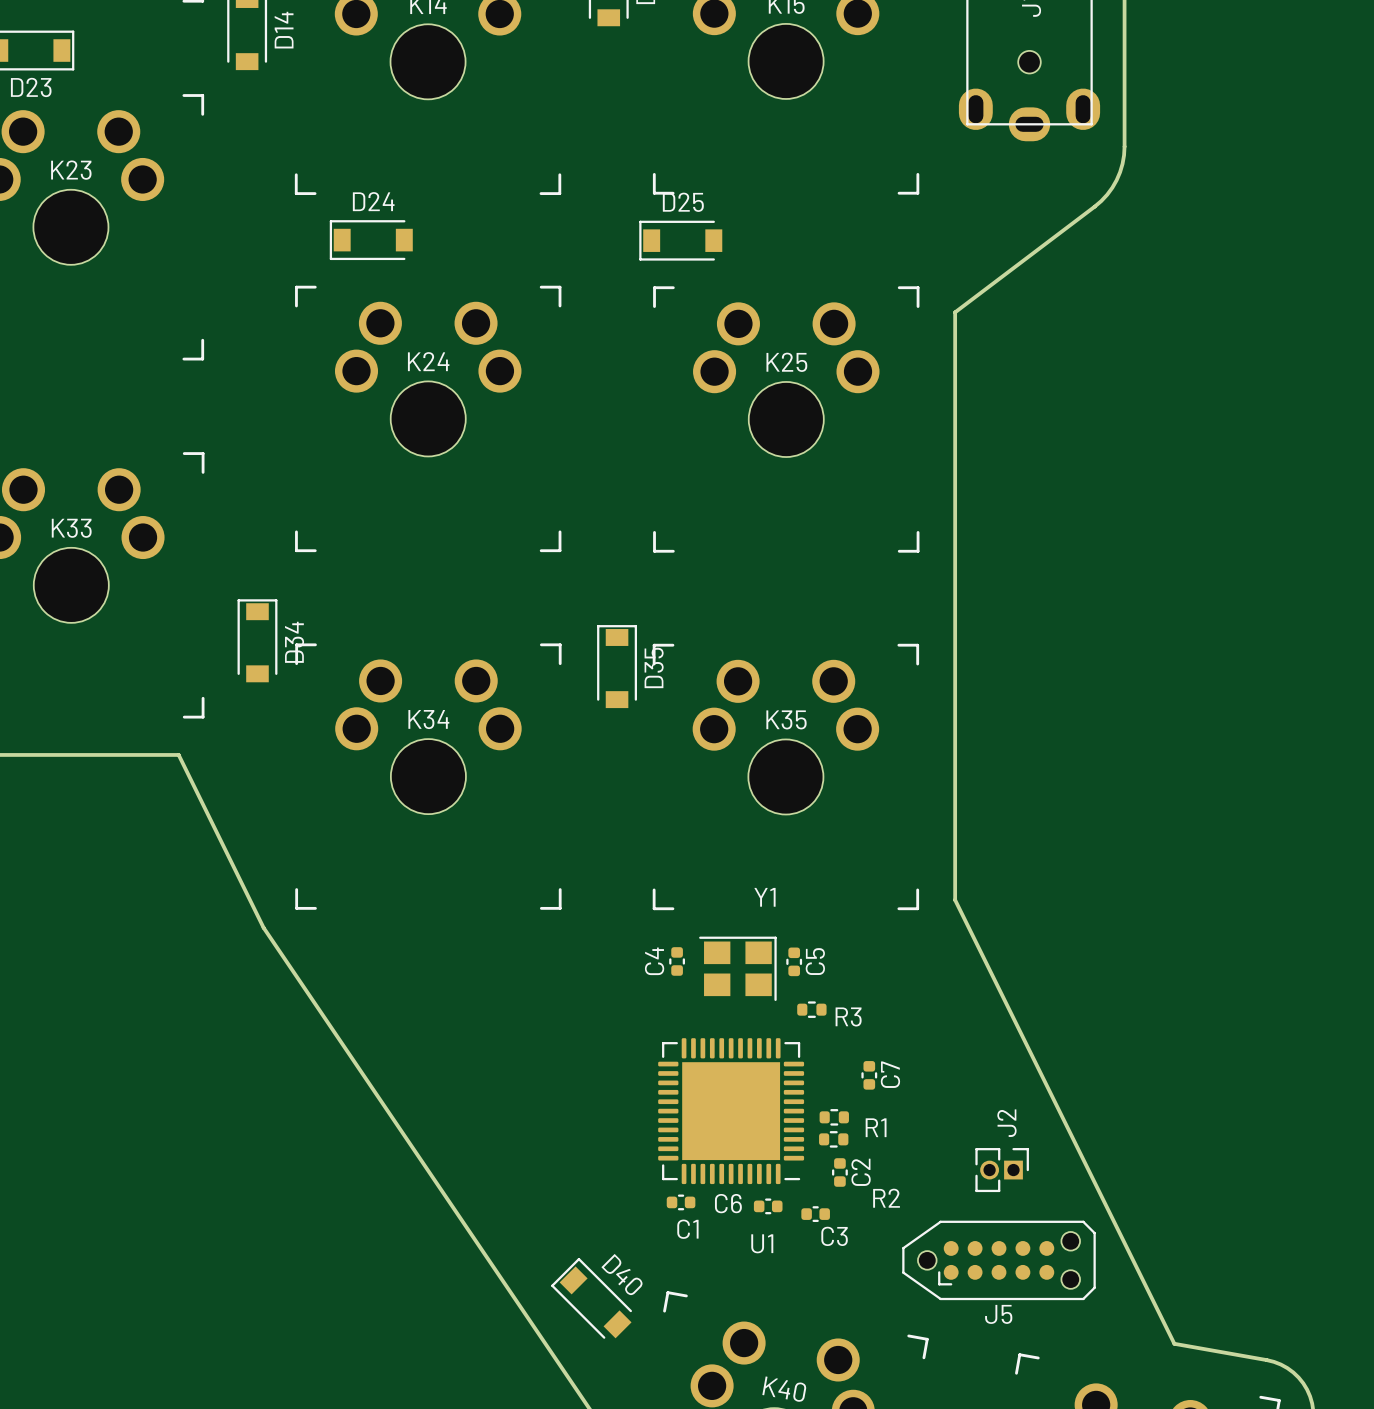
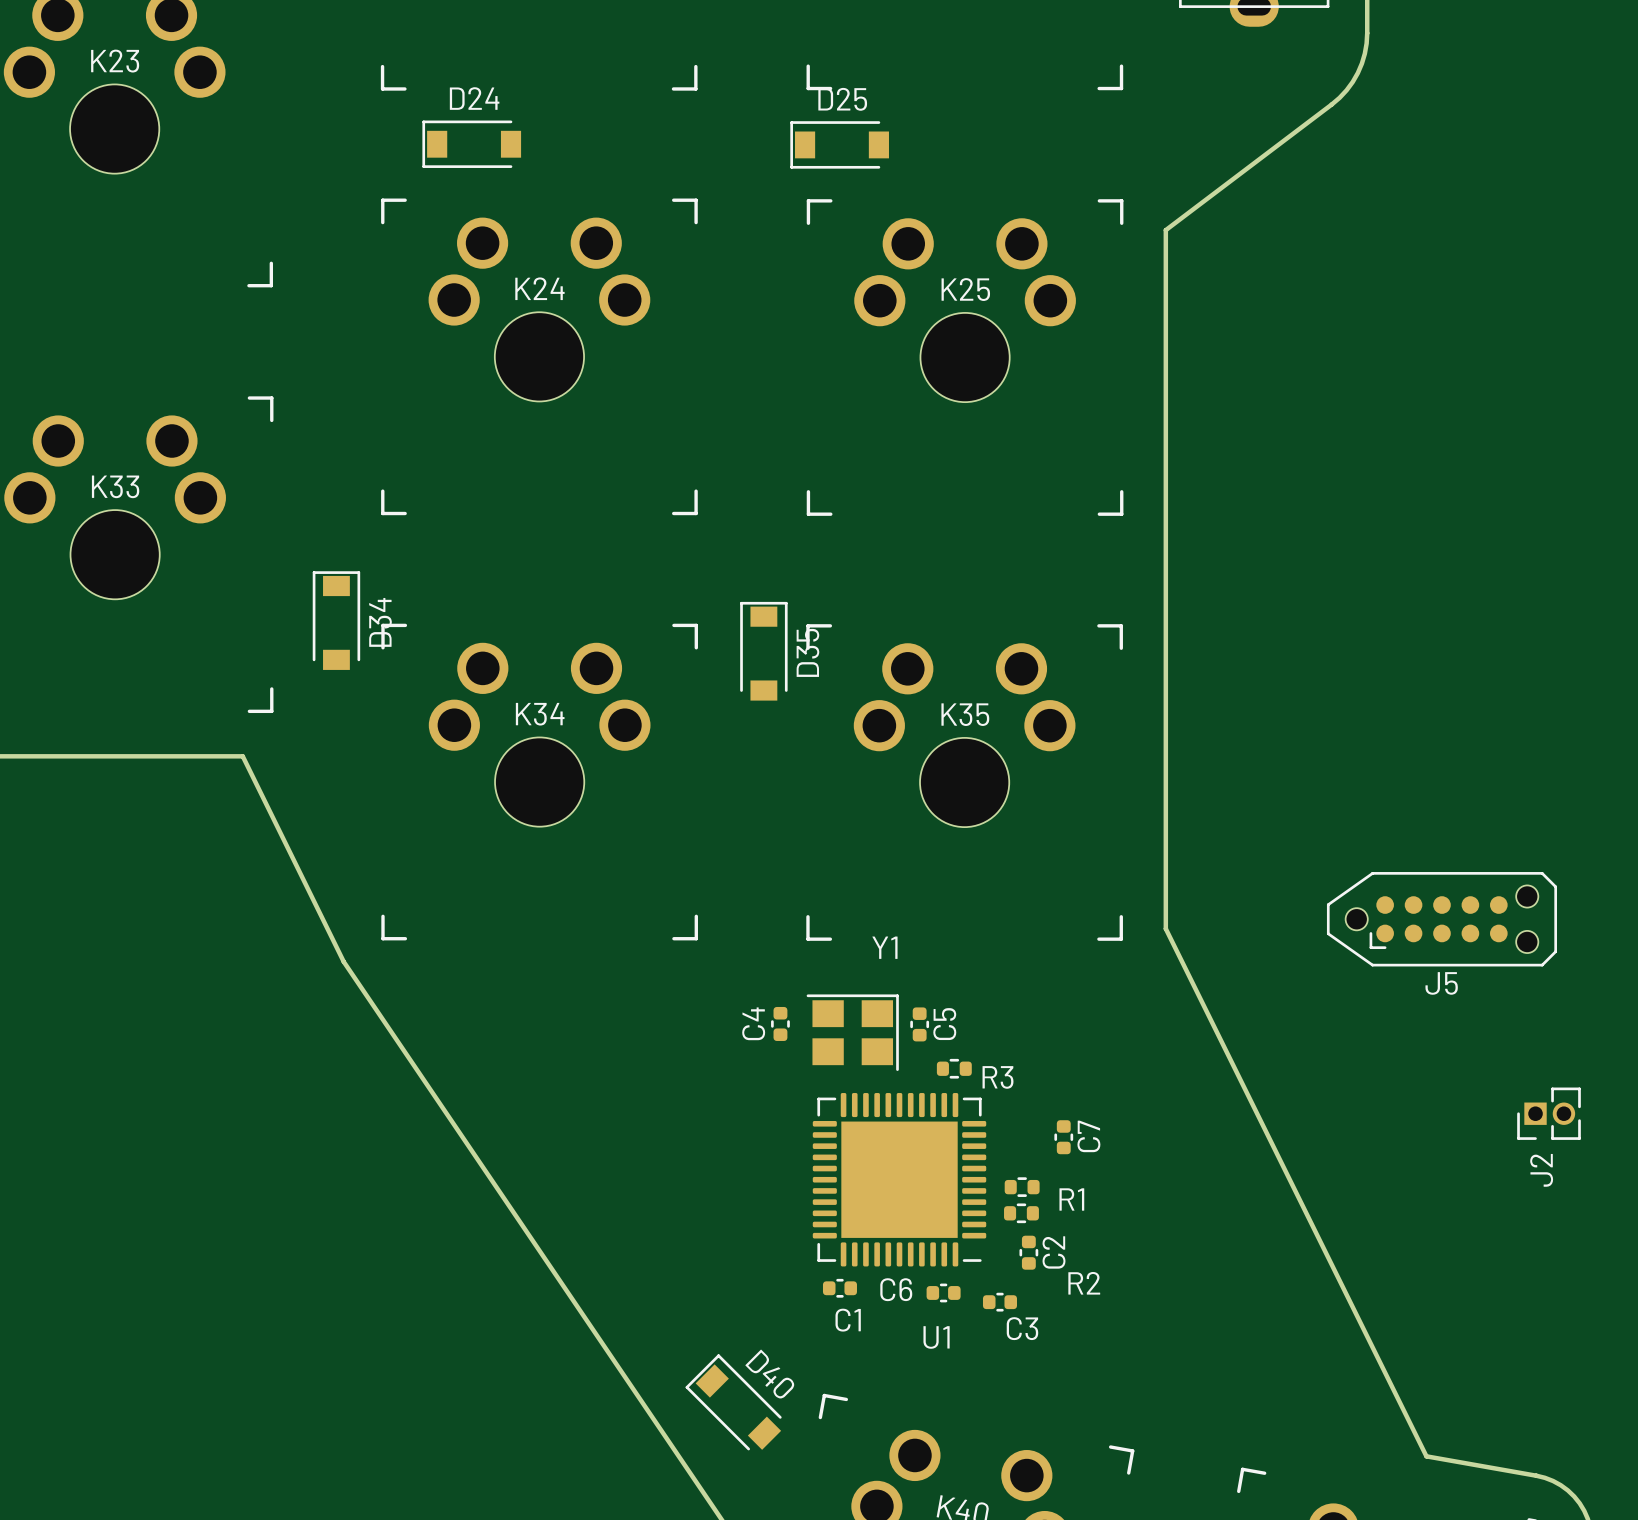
C4 position: (677, 961) -> (780, 1023)
C5 position: (794, 961) -> (919, 1024)
Y1 position: (737, 968) -> (852, 1032)
R3 position: (811, 1009) -> (954, 1068)
J2 rotation: 0° (1002, 1170) -> 180° (1549, 1113)
J2 position: (1002, 1170) -> (1549, 1113)
J5 position: (999, 1260) -> (1441, 919)

